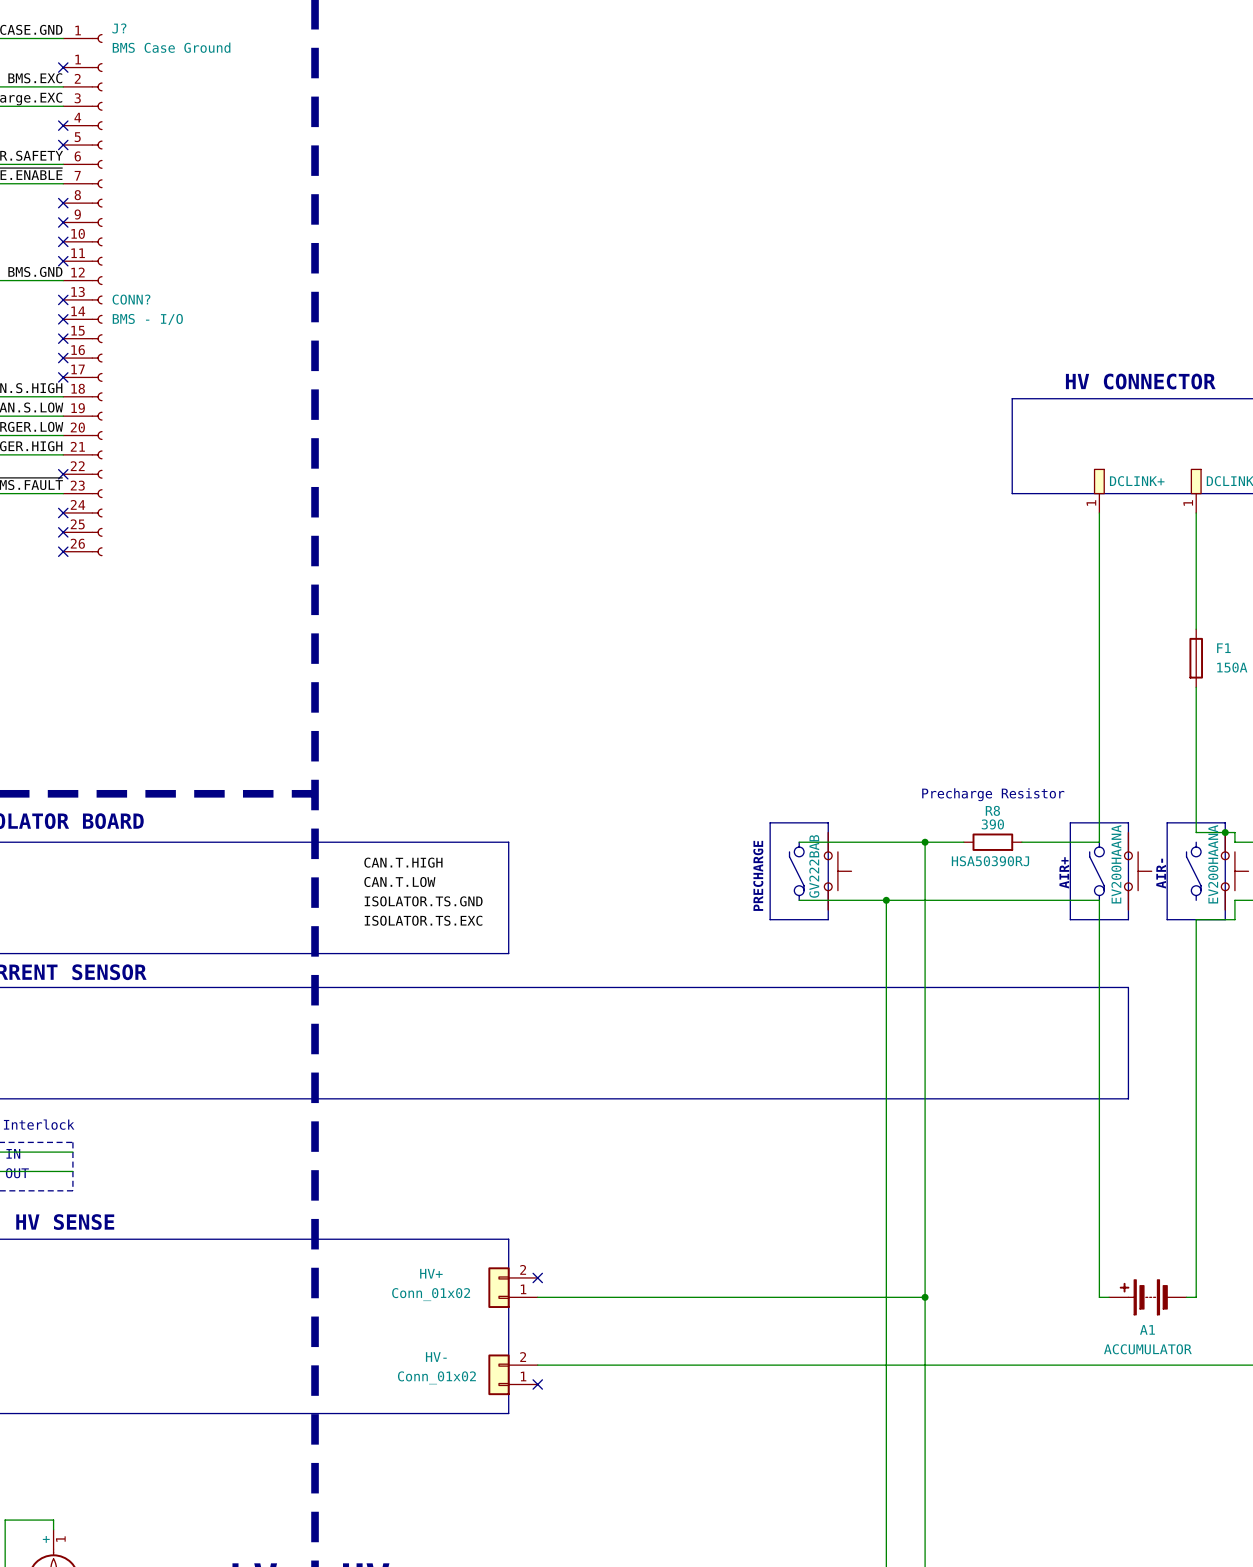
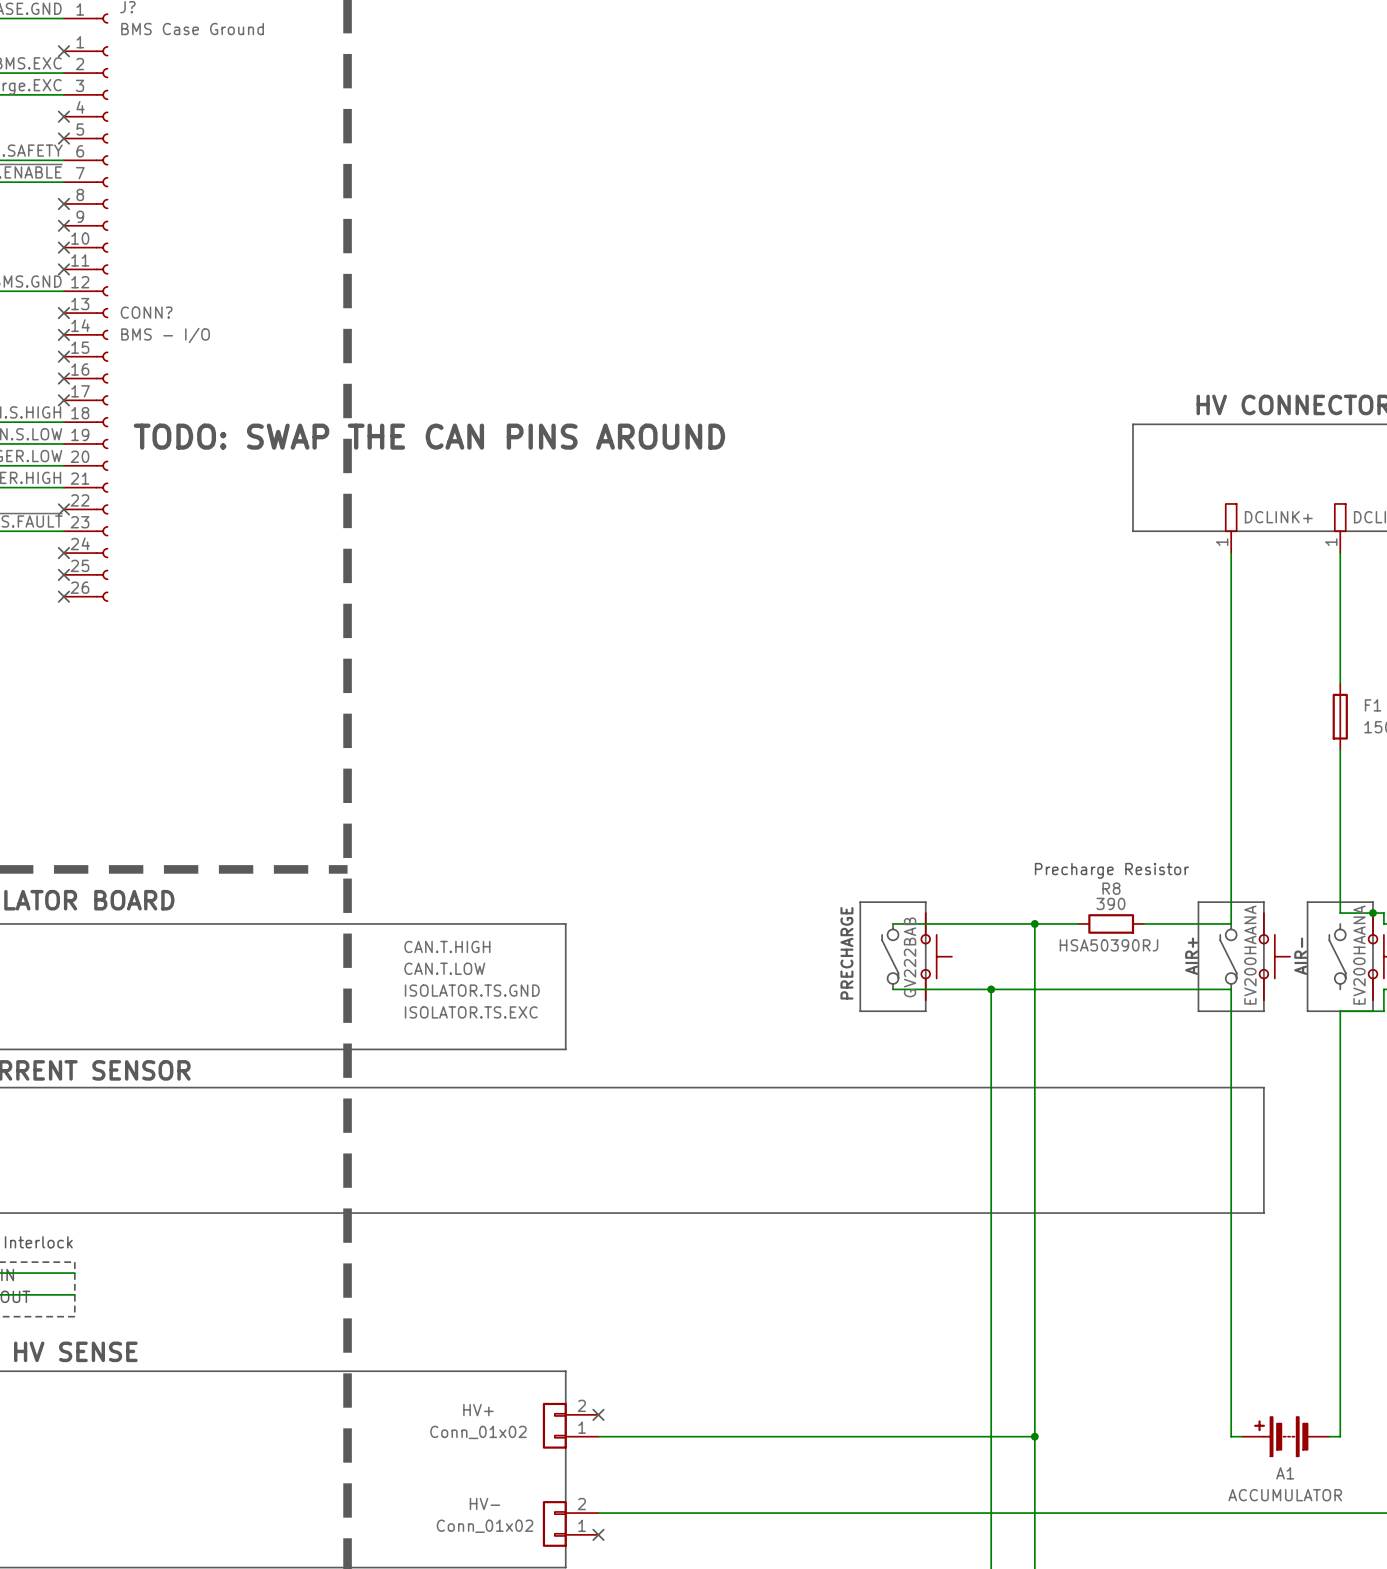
text: none -> TODO: SWAP THE CAN PINS AROUND (429, 436)

